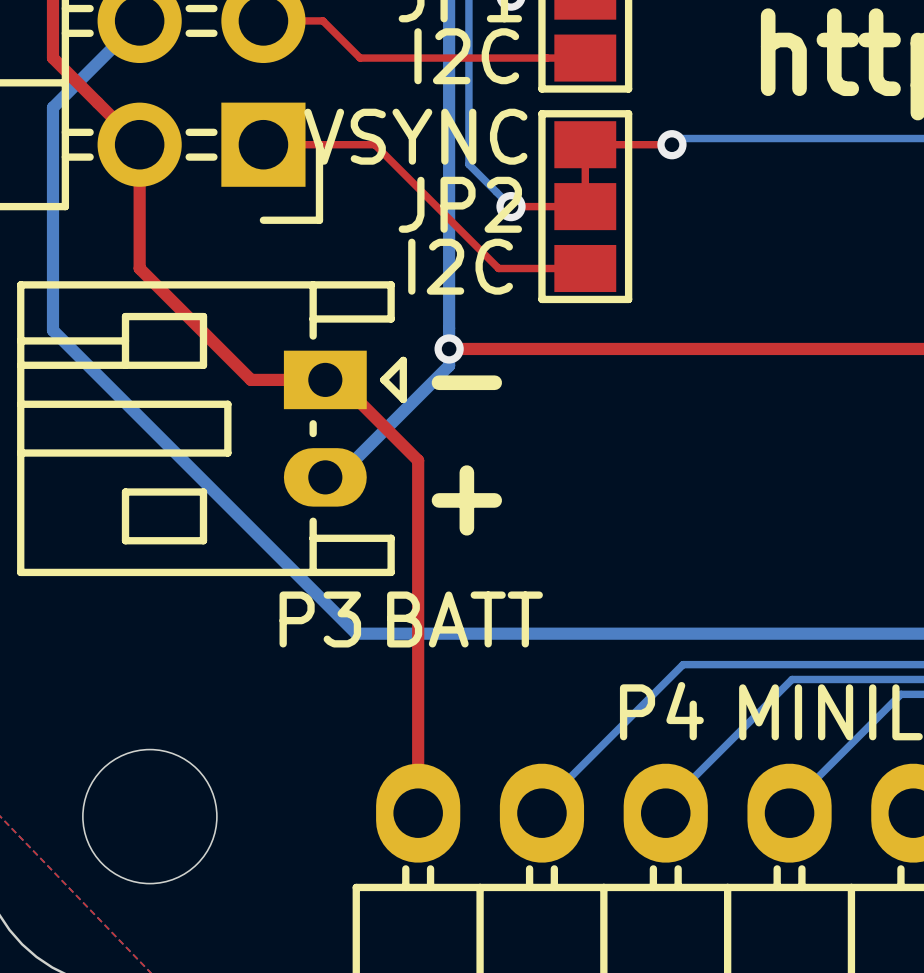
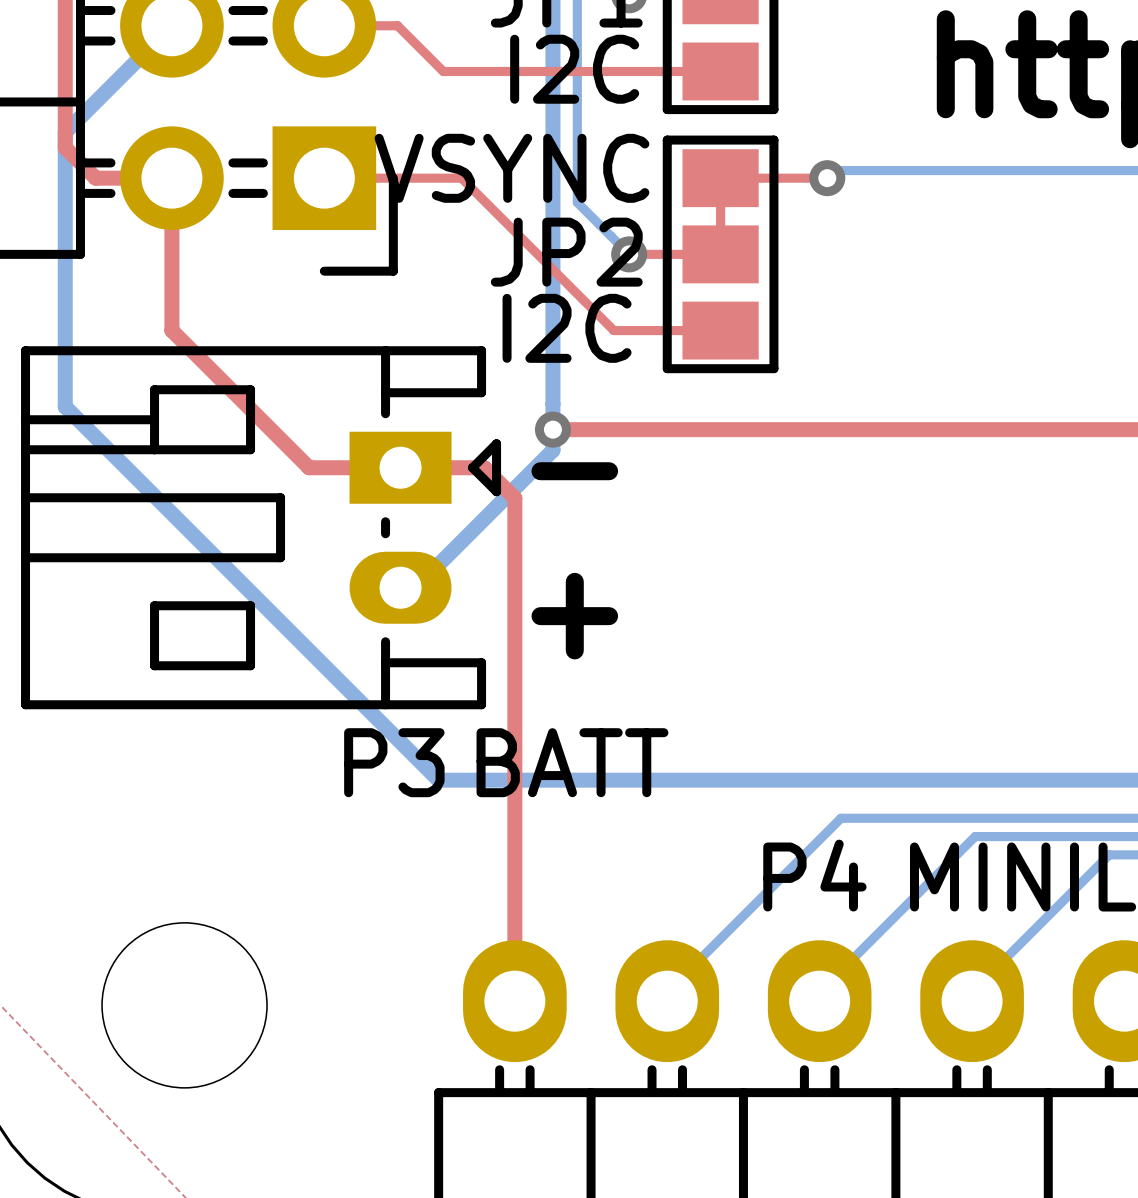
top track: (52, 58) (139, 144) -> (65, 71) (65, 147) (95, 178) (171, 178)
top track: (337, 379) (418, 460) -> (415, 467) (484, 467) (514, 498) (514, 567)

